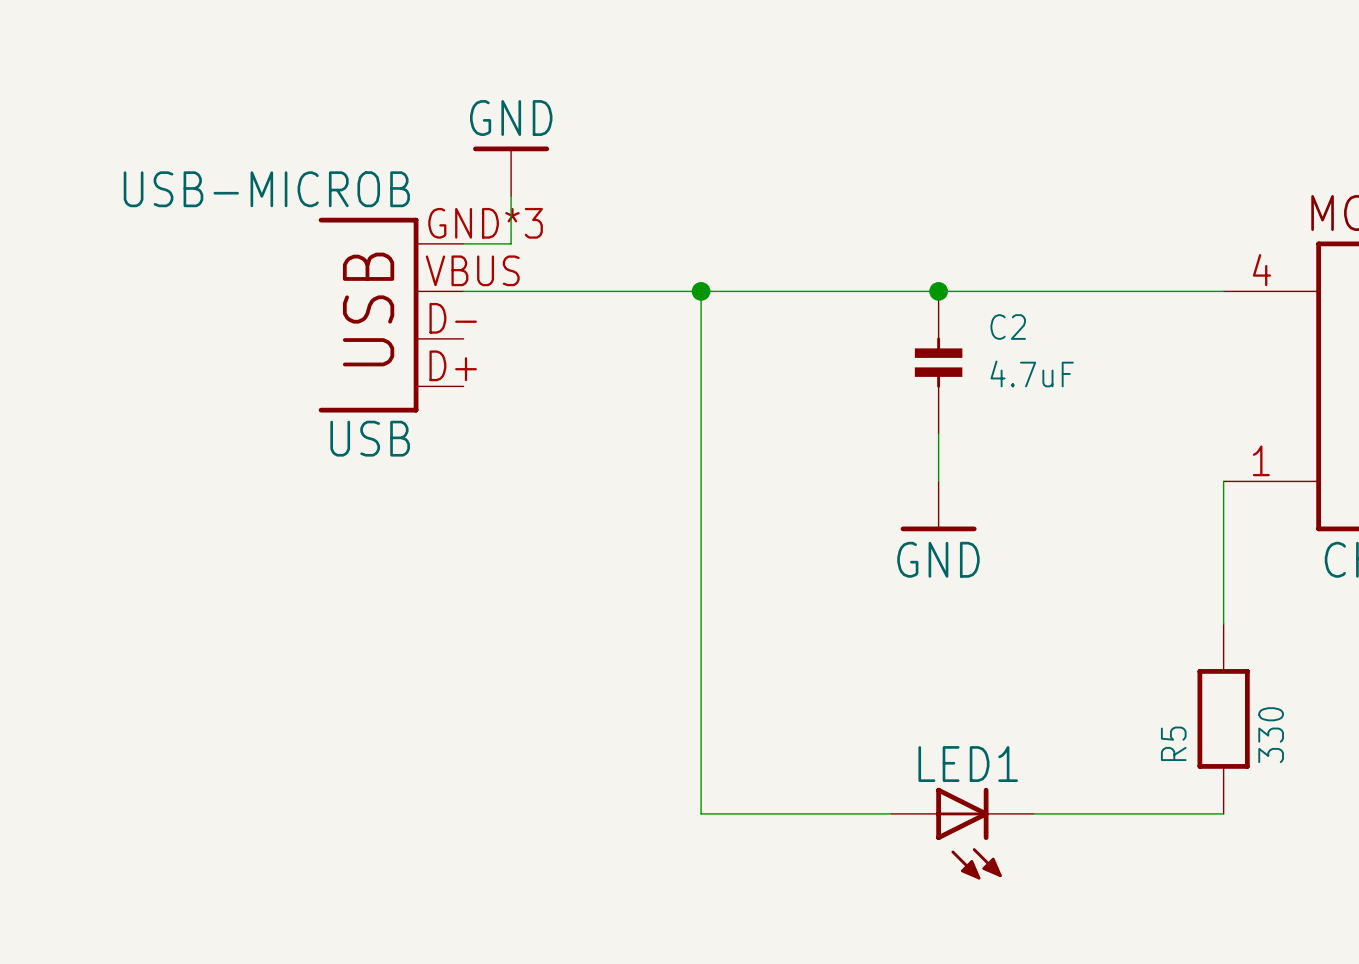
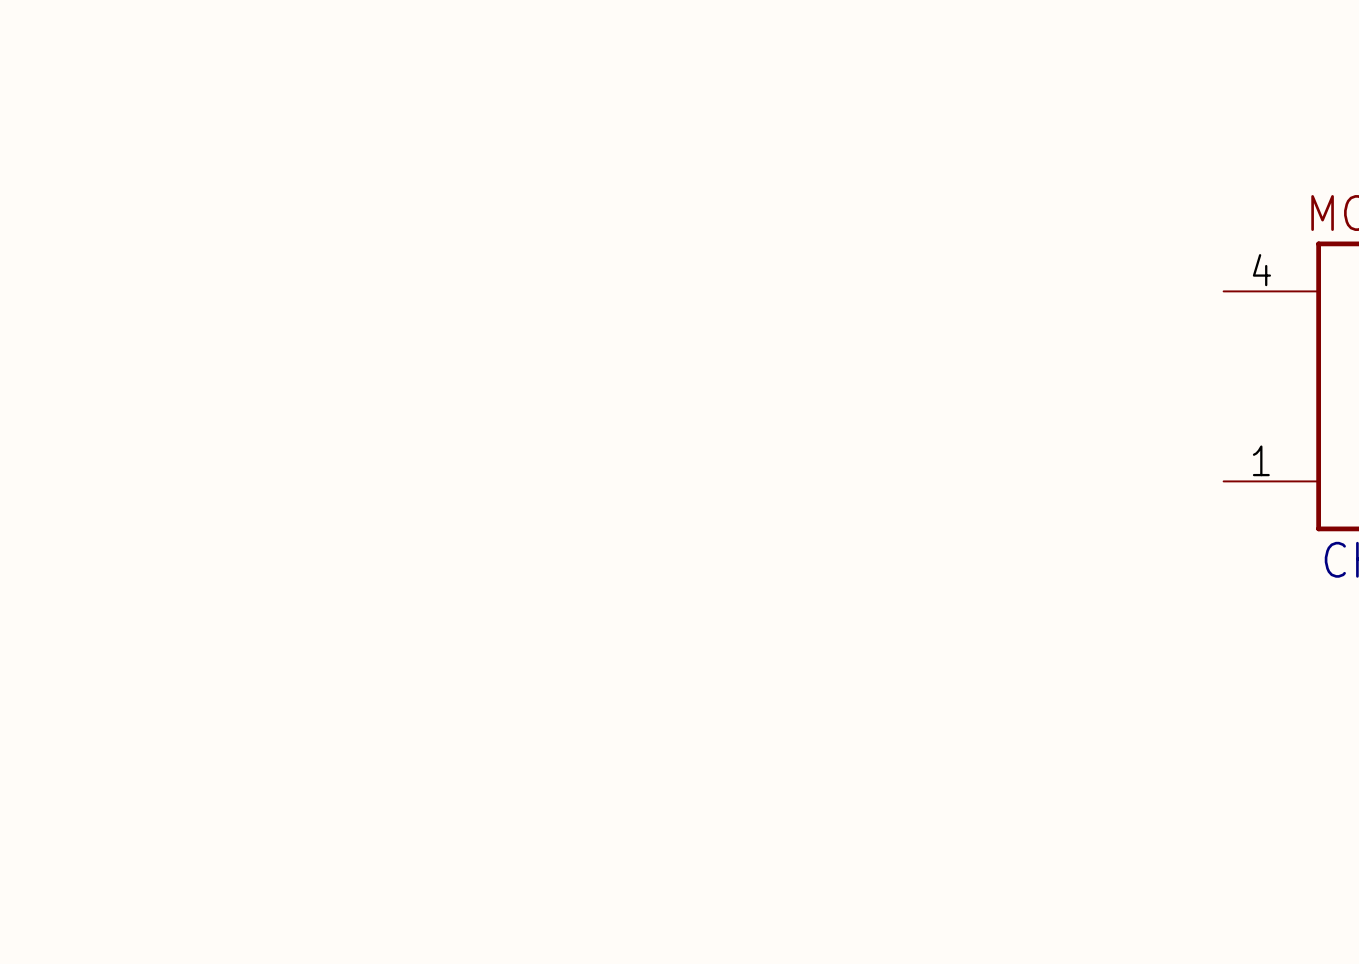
power symbol: GND (511, 171) -> none
wire: (511, 196) (511, 243) (463, 243) -> none
wire: (463, 291) (1223, 291) -> none
wire: (701, 291) (701, 813) (891, 813) -> none
junction: (701, 291) -> none
junction: (938, 291) -> none
USB: USB-MICROB (391, 315) -> none
C2: 4.7uF (938, 362) -> none
wire: (938, 433) (938, 481) -> none
wire: (1223, 481) (1223, 623) -> none
power symbol: GND (938, 506) -> none
R5: 330 (1223, 718) -> none
wire: (1033, 813) (1223, 813) -> none
LED1: (962, 833) -> none

